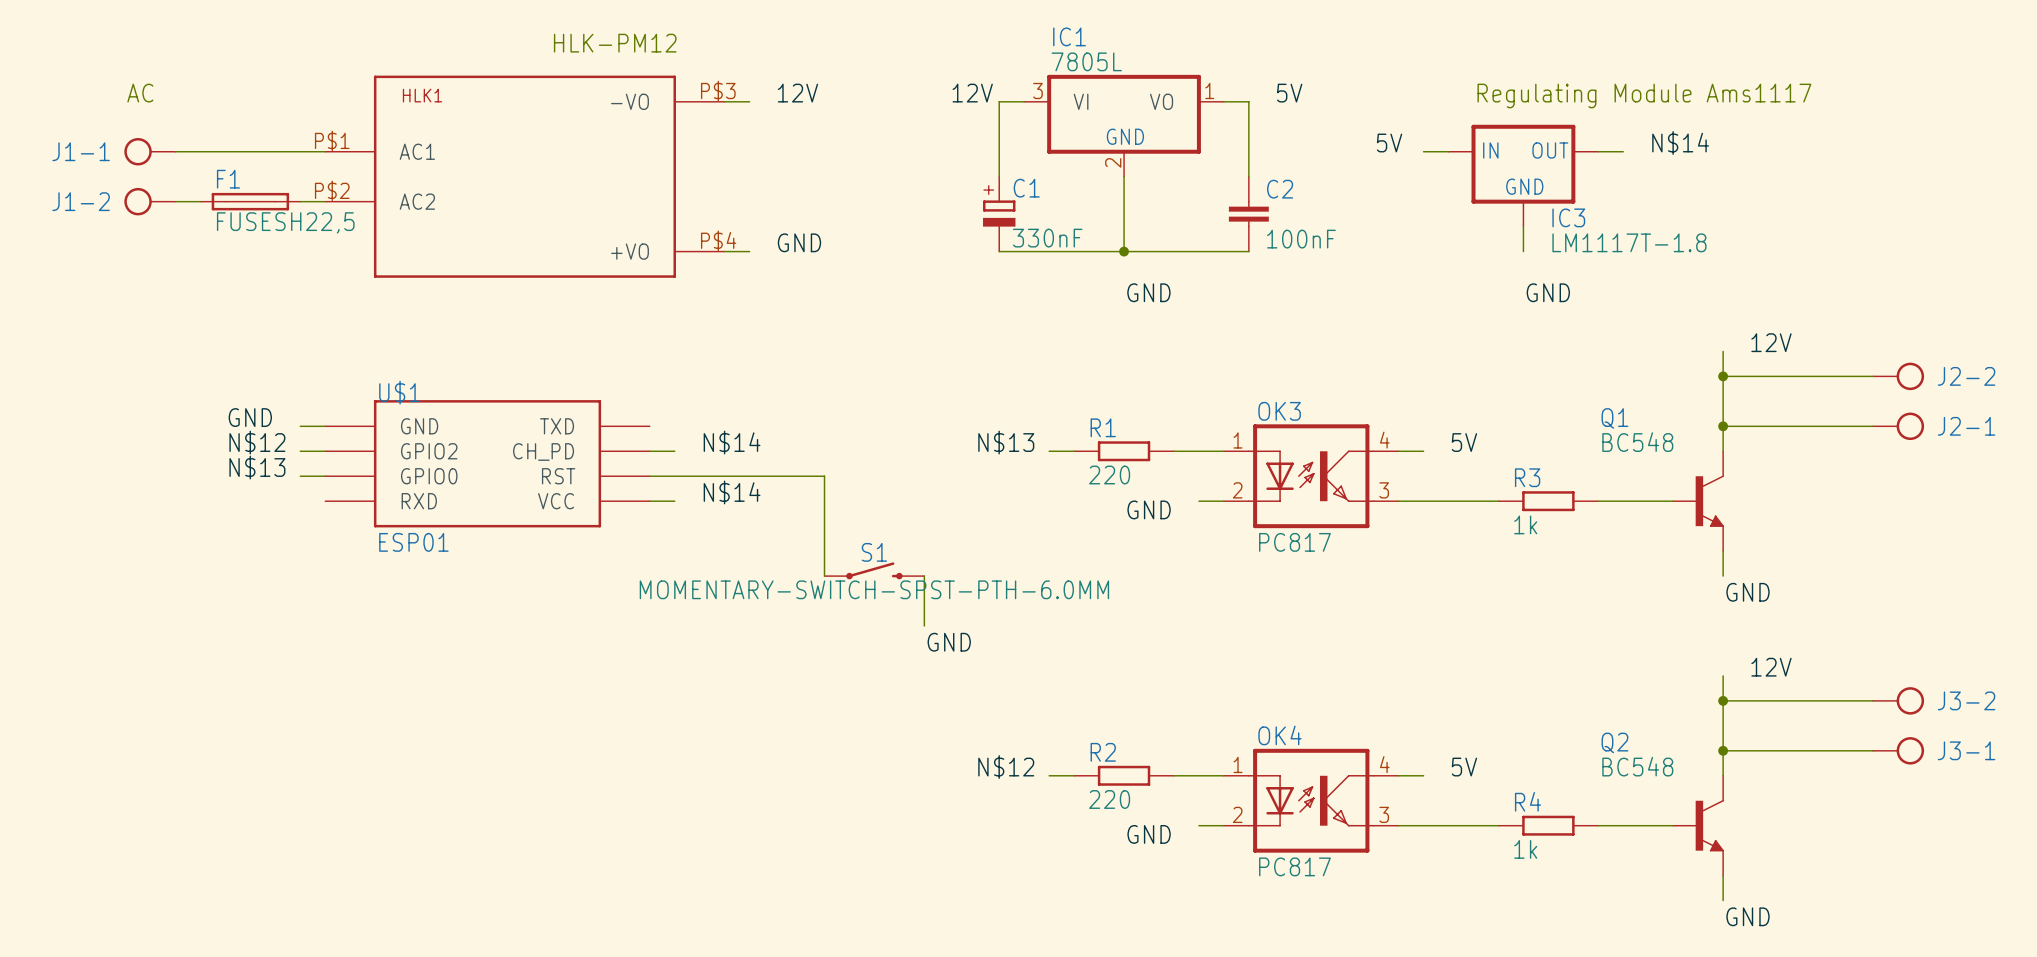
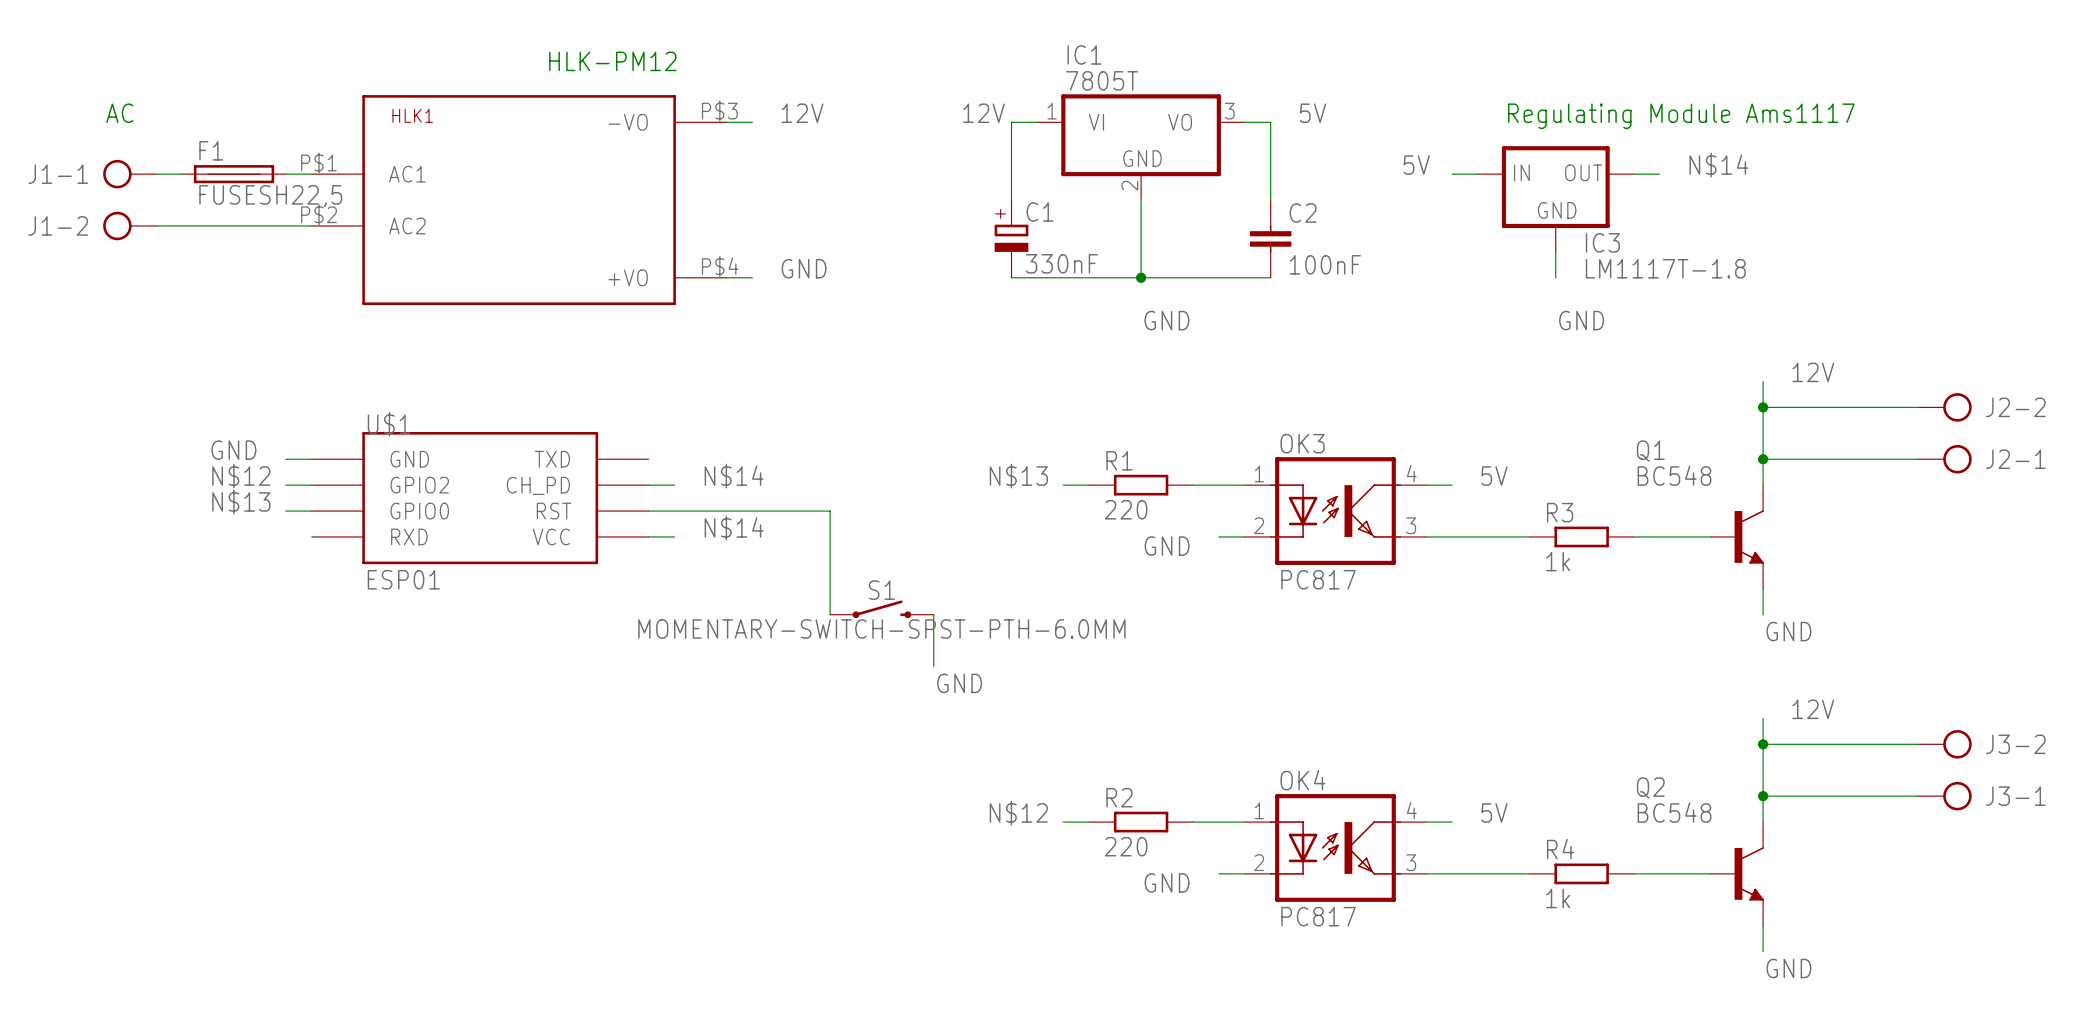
IC1 value: 7805L (1086, 61) -> 7805T (1102, 80)
IC1 pin number: 3 (1037, 91) -> 1 (1052, 111)
IC1 pin number: 1 (1209, 91) -> 3 (1229, 111)
F1 position: (250, 201) -> (234, 174)

